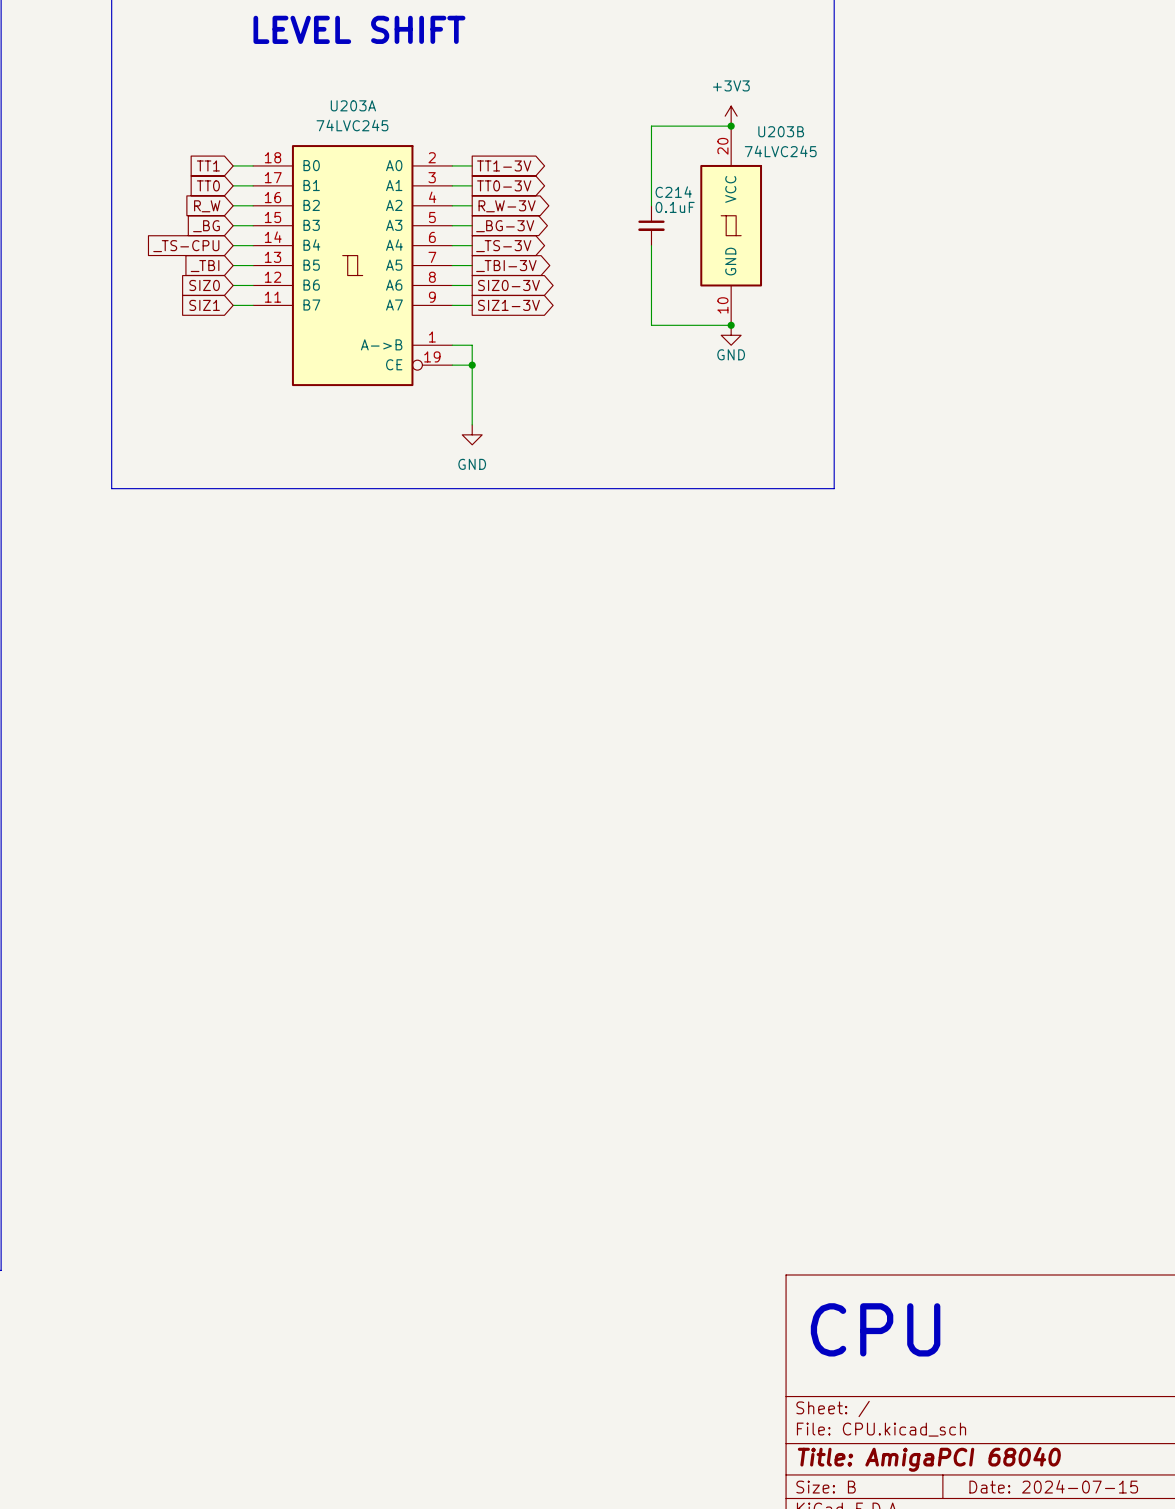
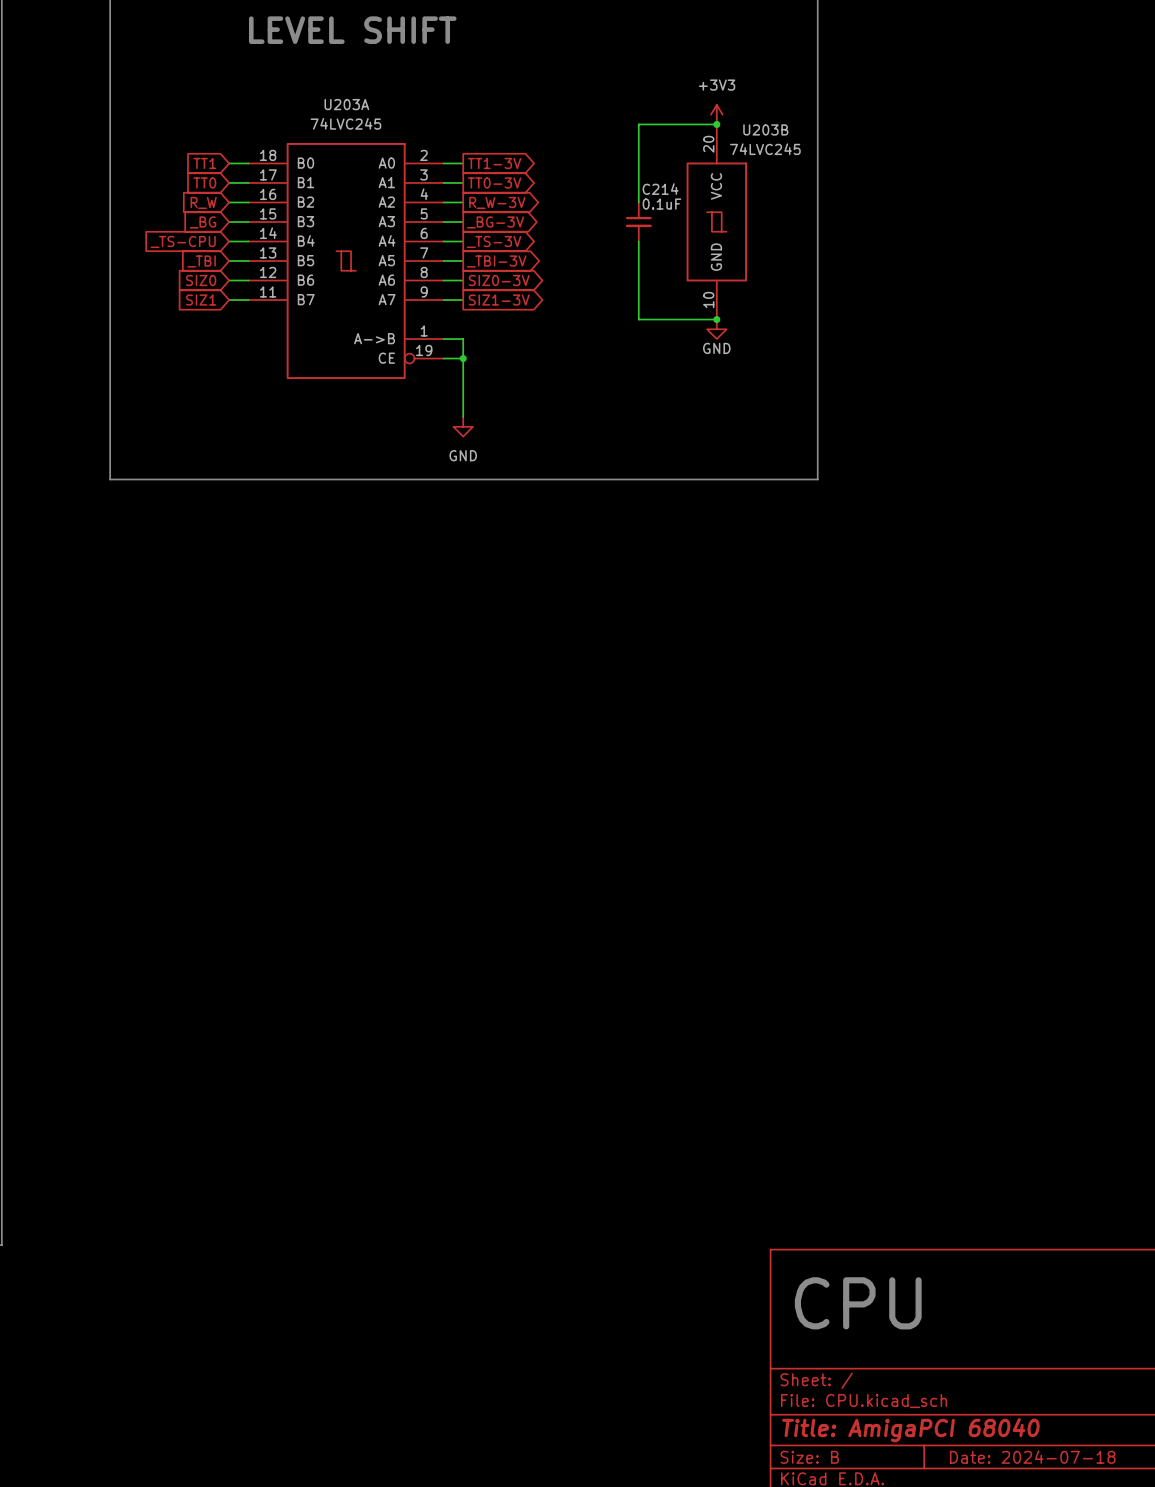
title block: Date: 2024-07-15 (1053, 1486) -> Date: 2024-07-18 (1032, 1457)

